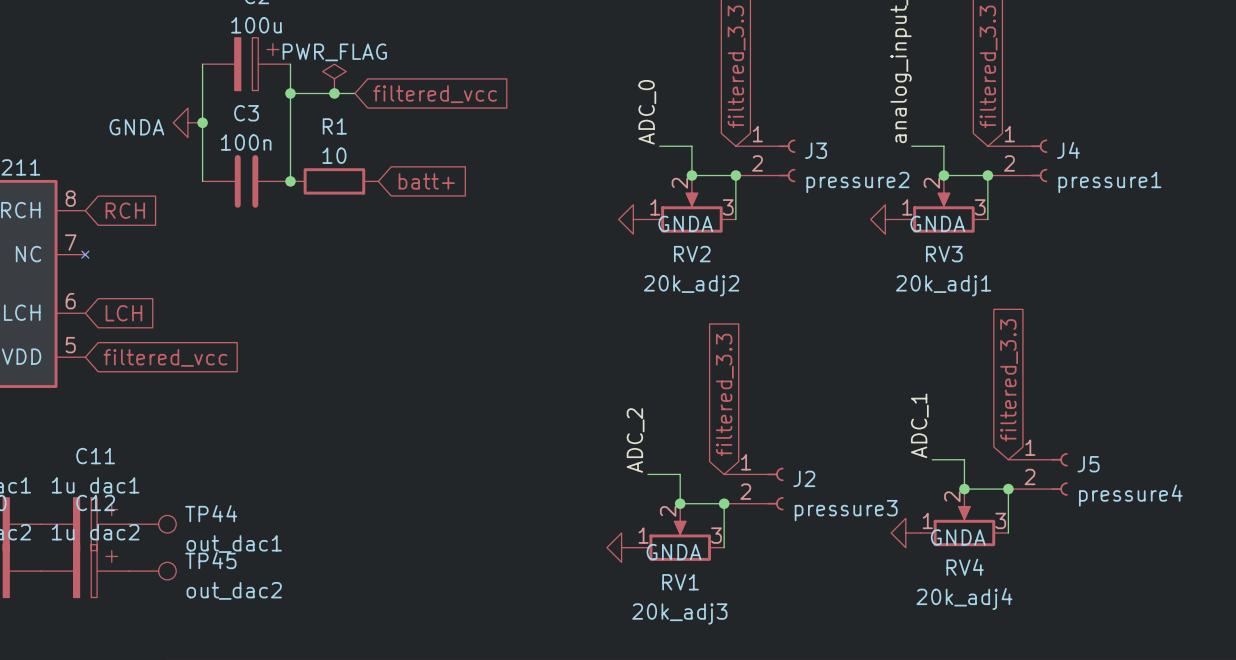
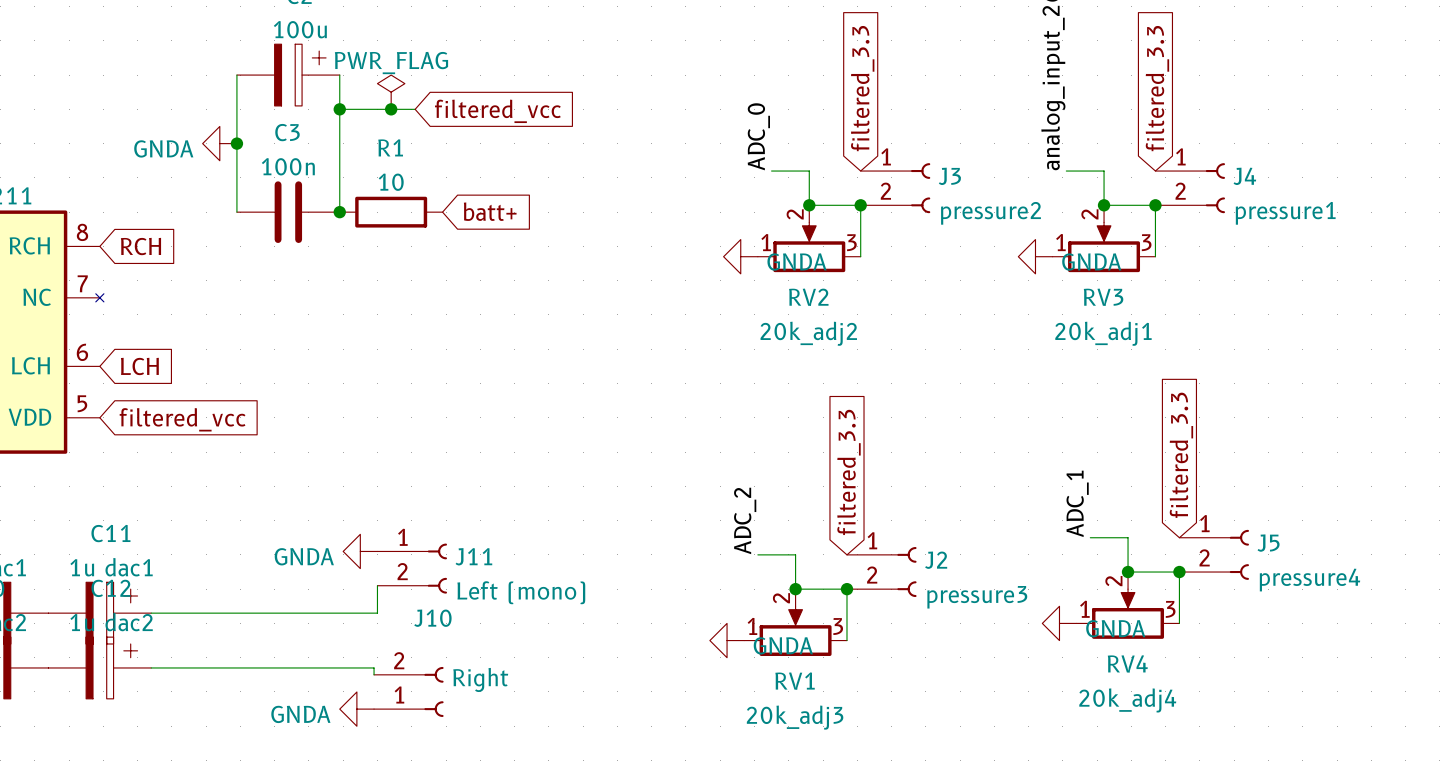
power symbol: none -> GNDA (360, 551)
J11: none -> Left (mono) (412, 568)
wire: none -> (377, 585) (377, 613) (151, 613)
TP44: out_dac1 (152, 524) -> none
wire: none -> (151, 667) (374, 667) (374, 674)
TP45: out_dac2 (152, 571) -> none
J10: none -> Right (408, 691)
power symbol: none -> GNDA (356, 709)

